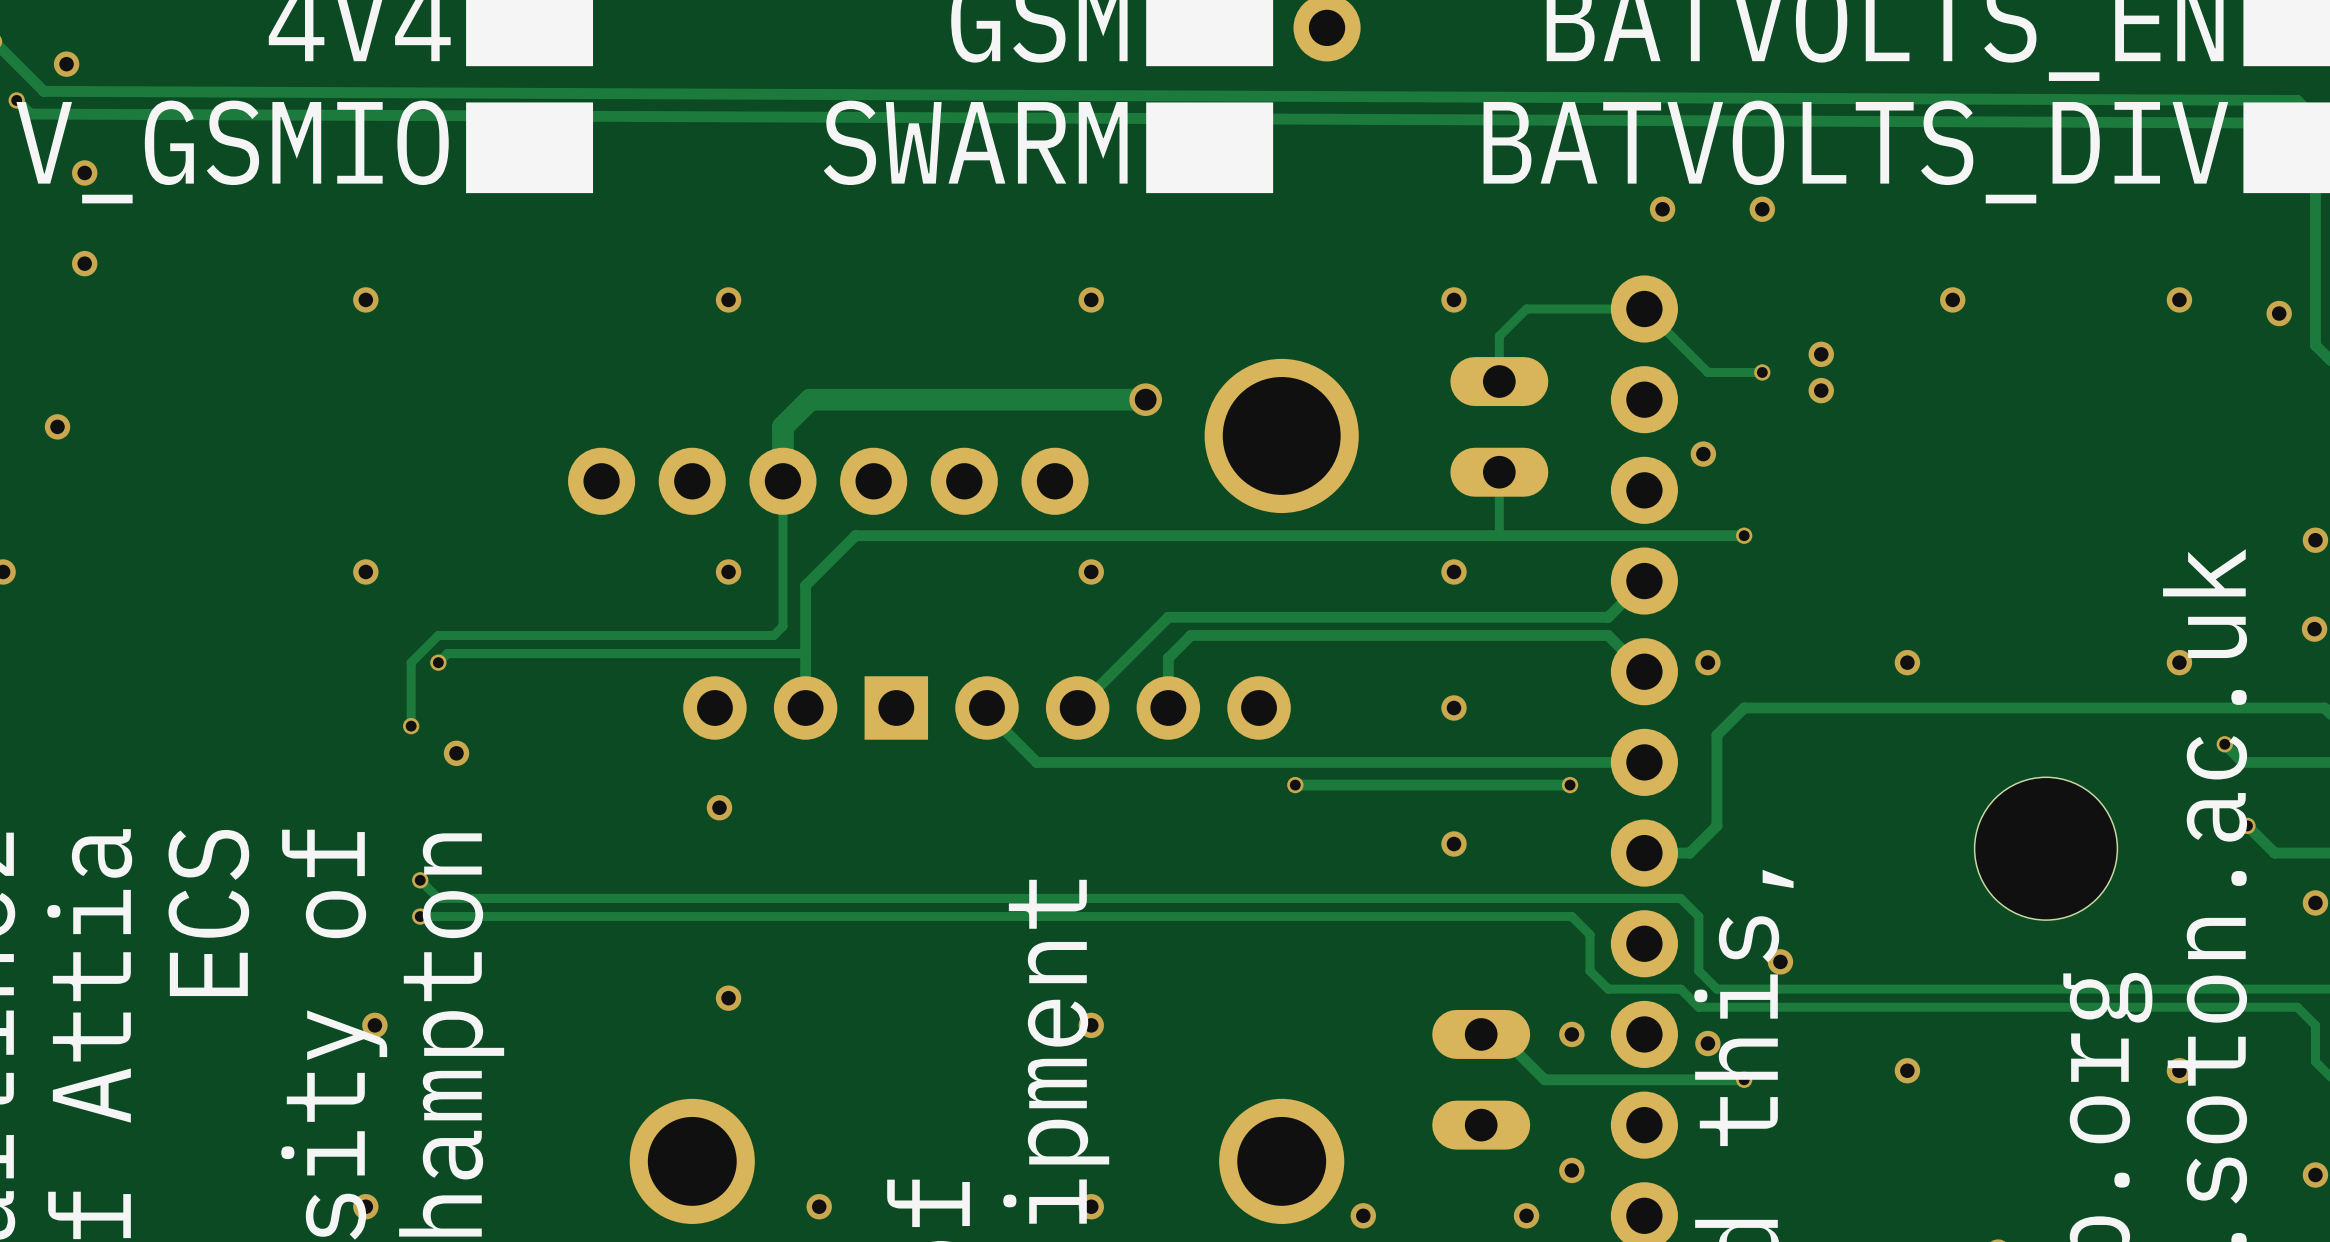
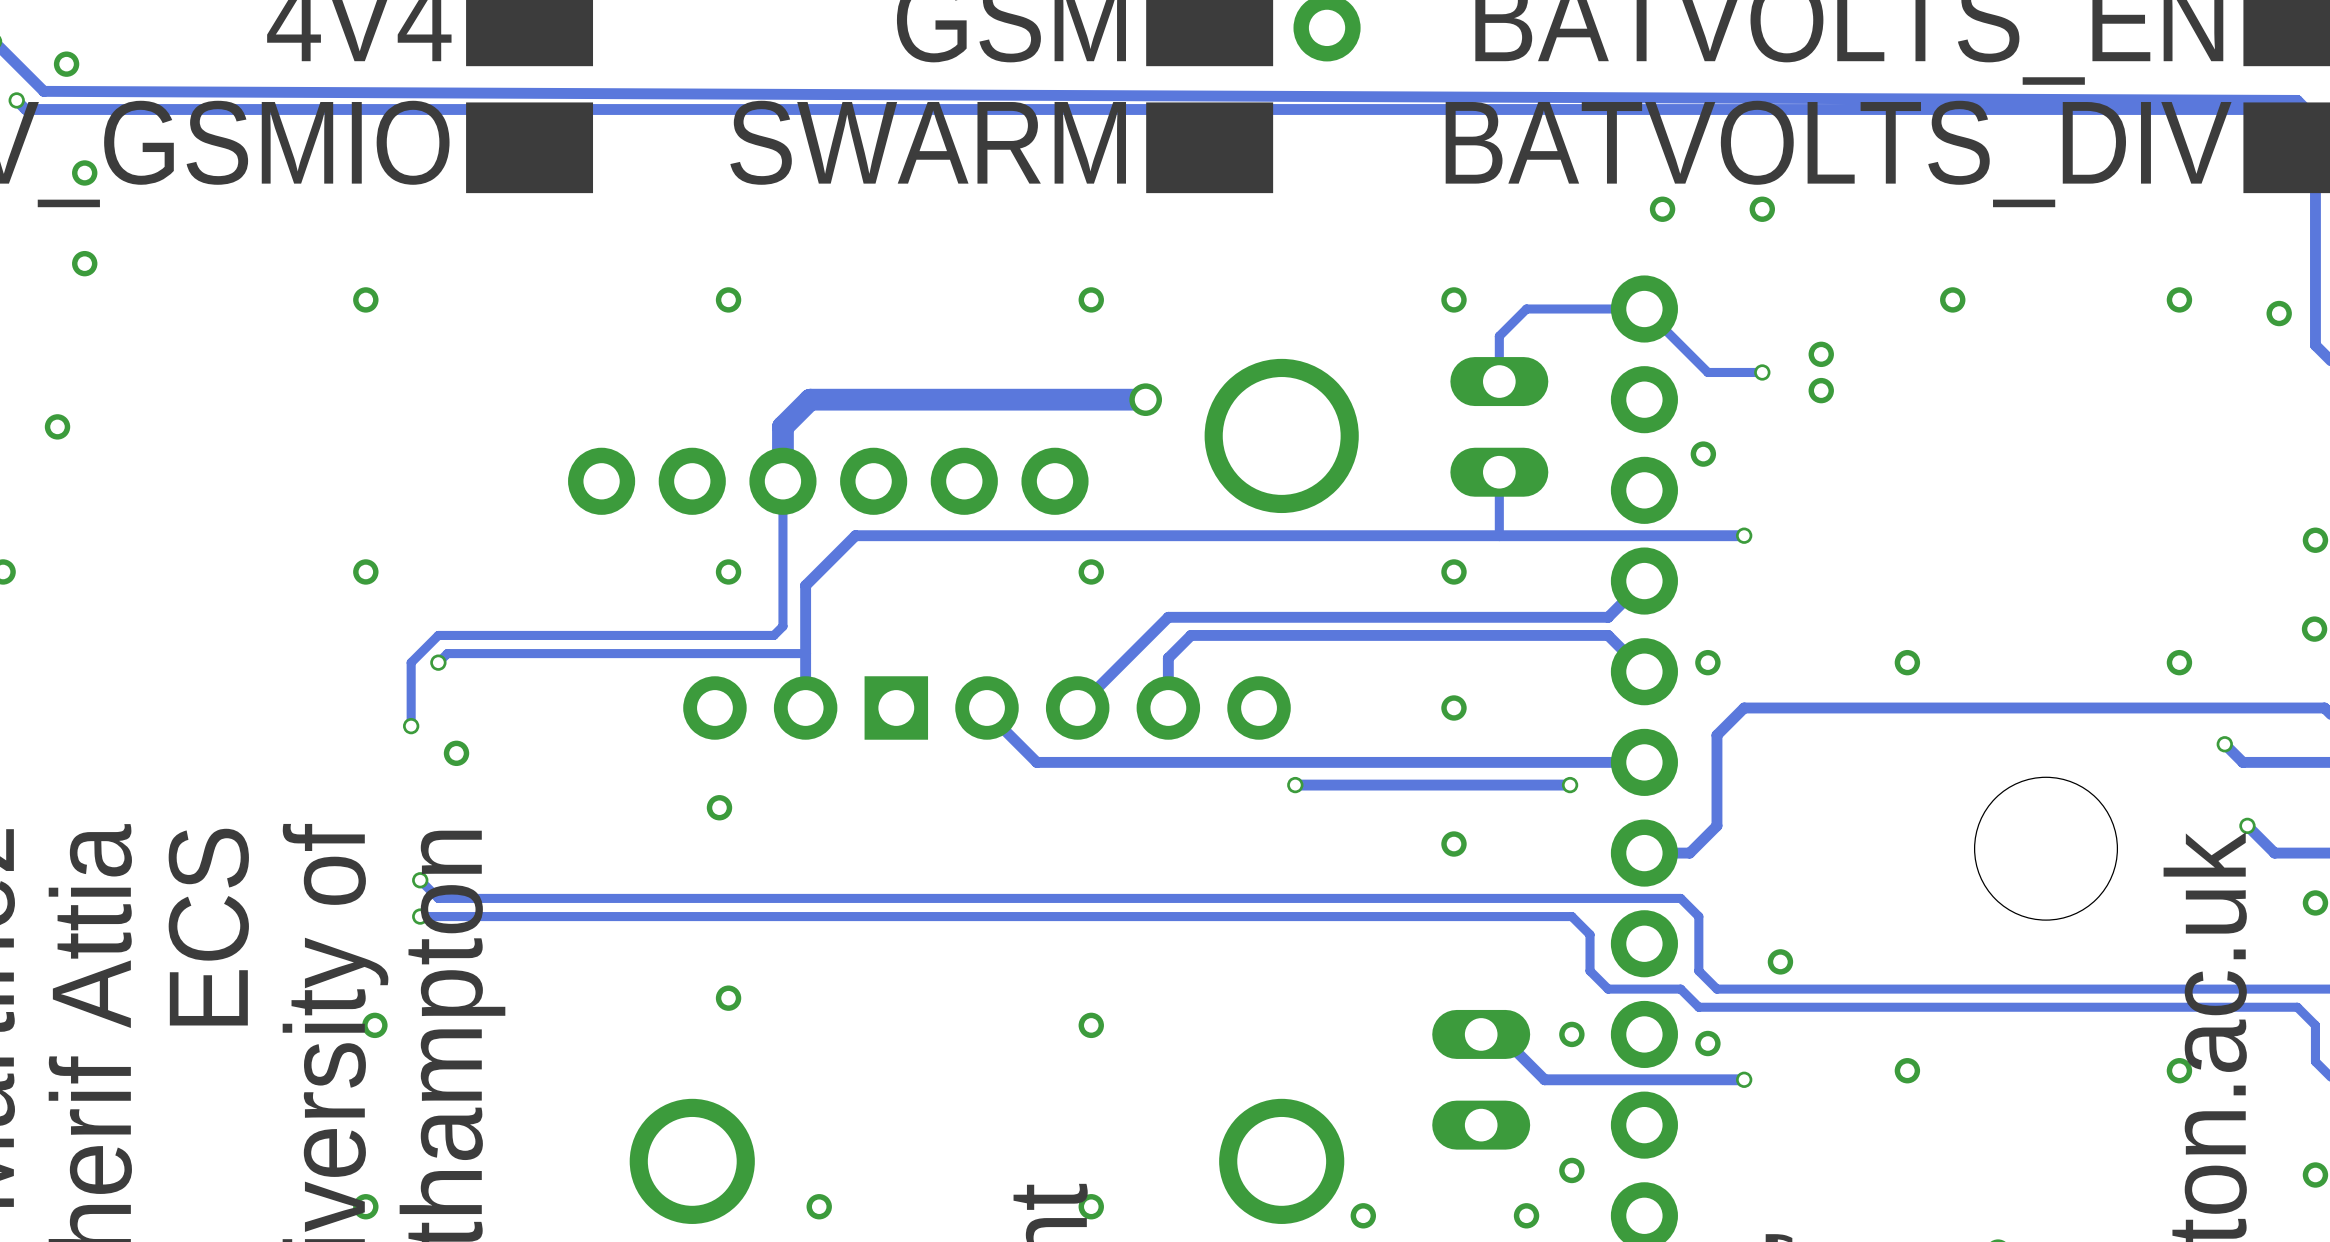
track: (25, 109) (30, 114) (2288, 123) -> (25, 109) (2274, 109) (2288, 123)

